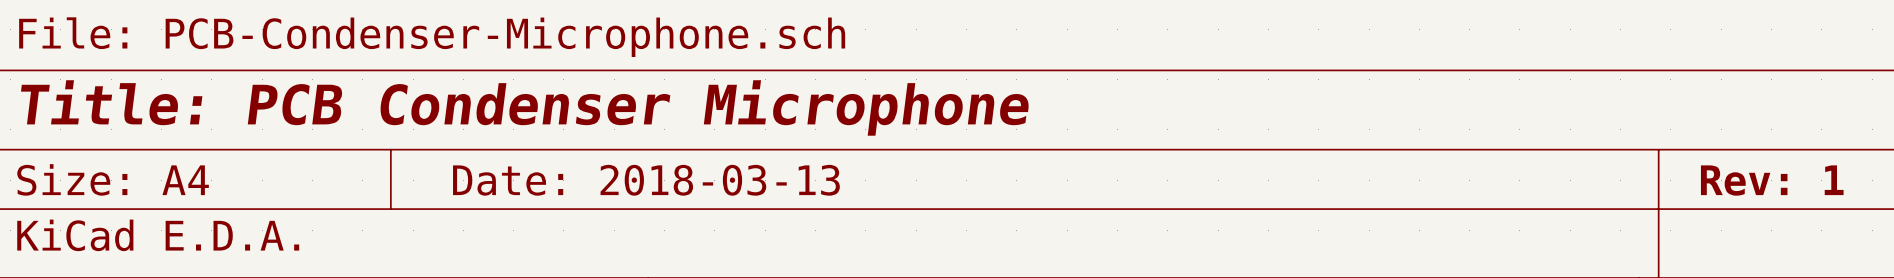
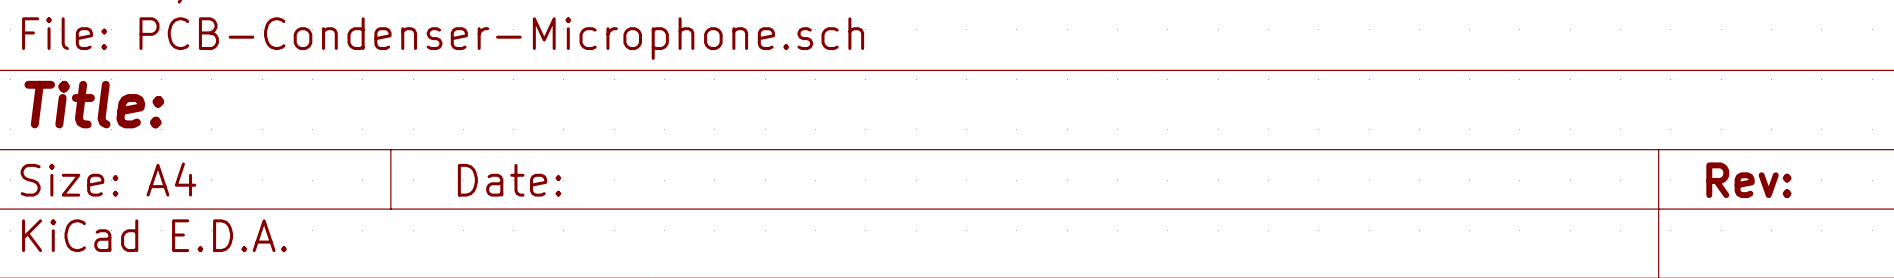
title block: Title: PCB Condenser Microphone (525, 107) -> Title: (94, 104)
title block: Date: 2018-03-13 (646, 180) -> Date: (509, 180)
title block: Rev: 1 (1772, 180) -> Rev: (1748, 180)

